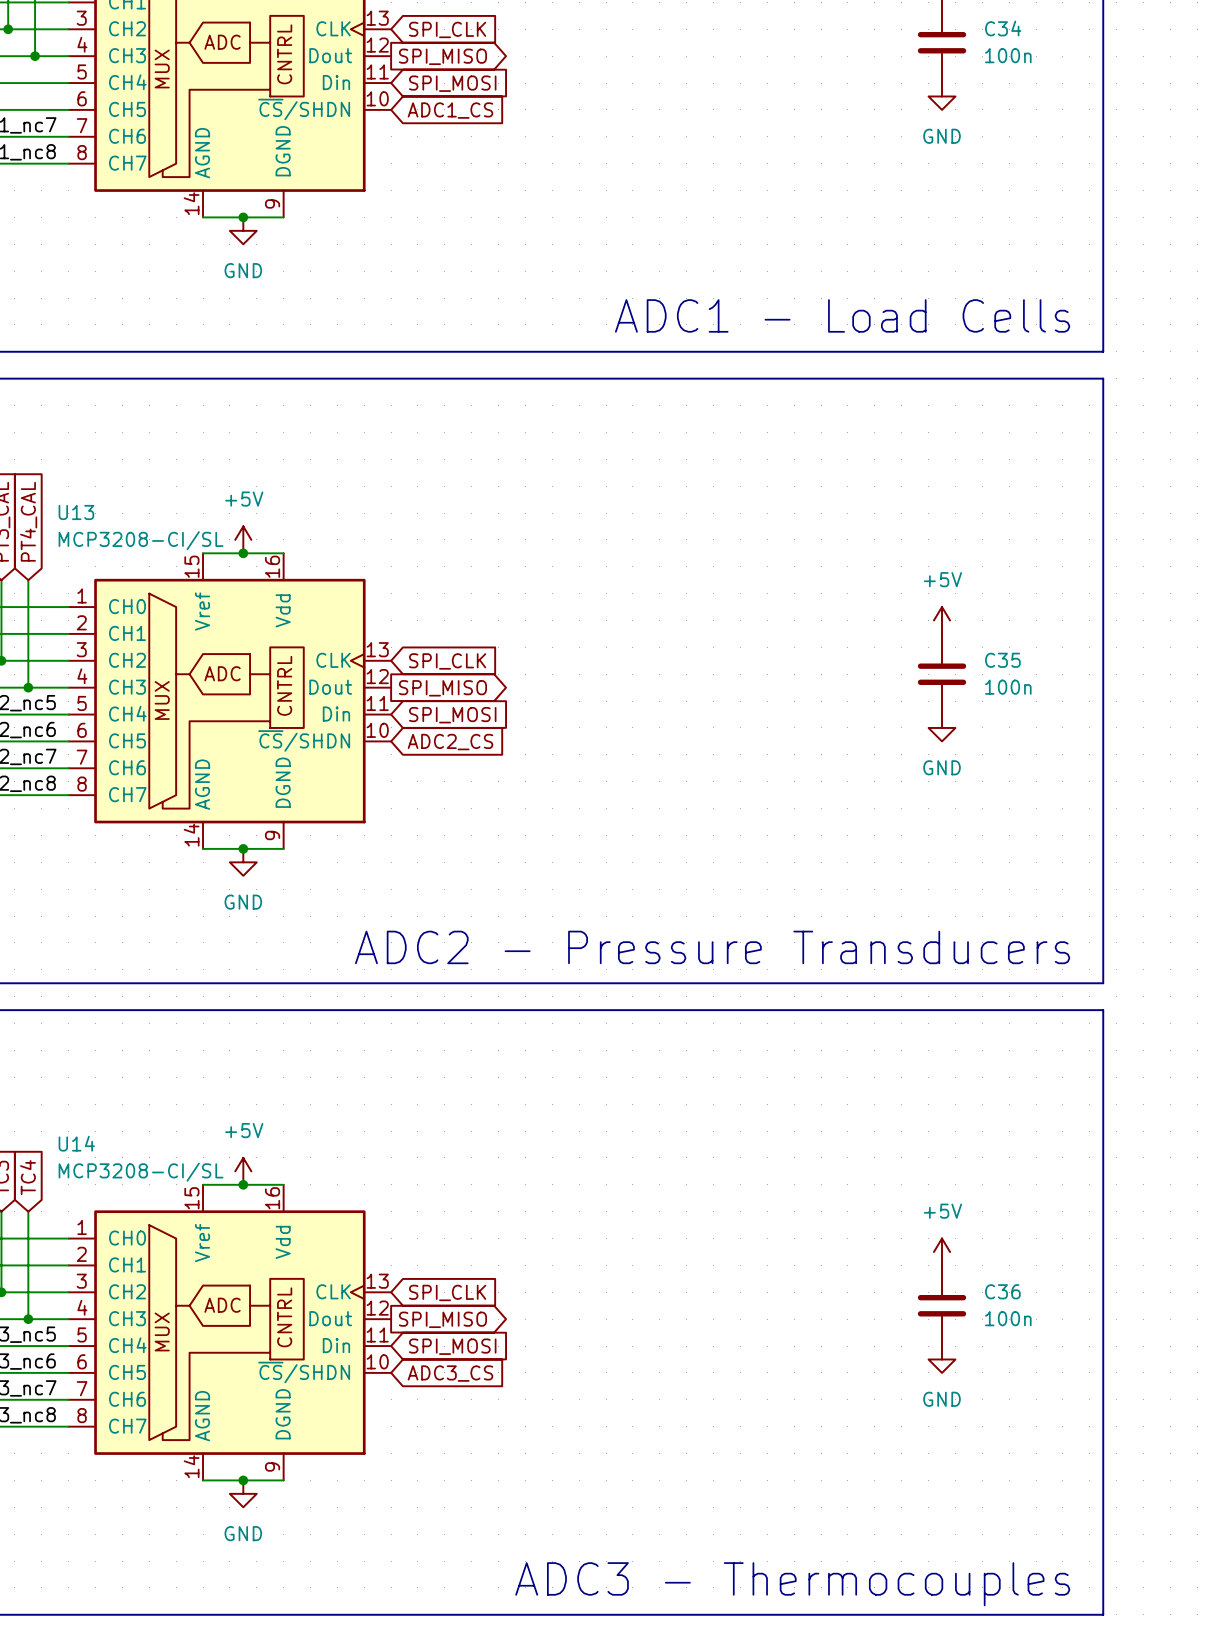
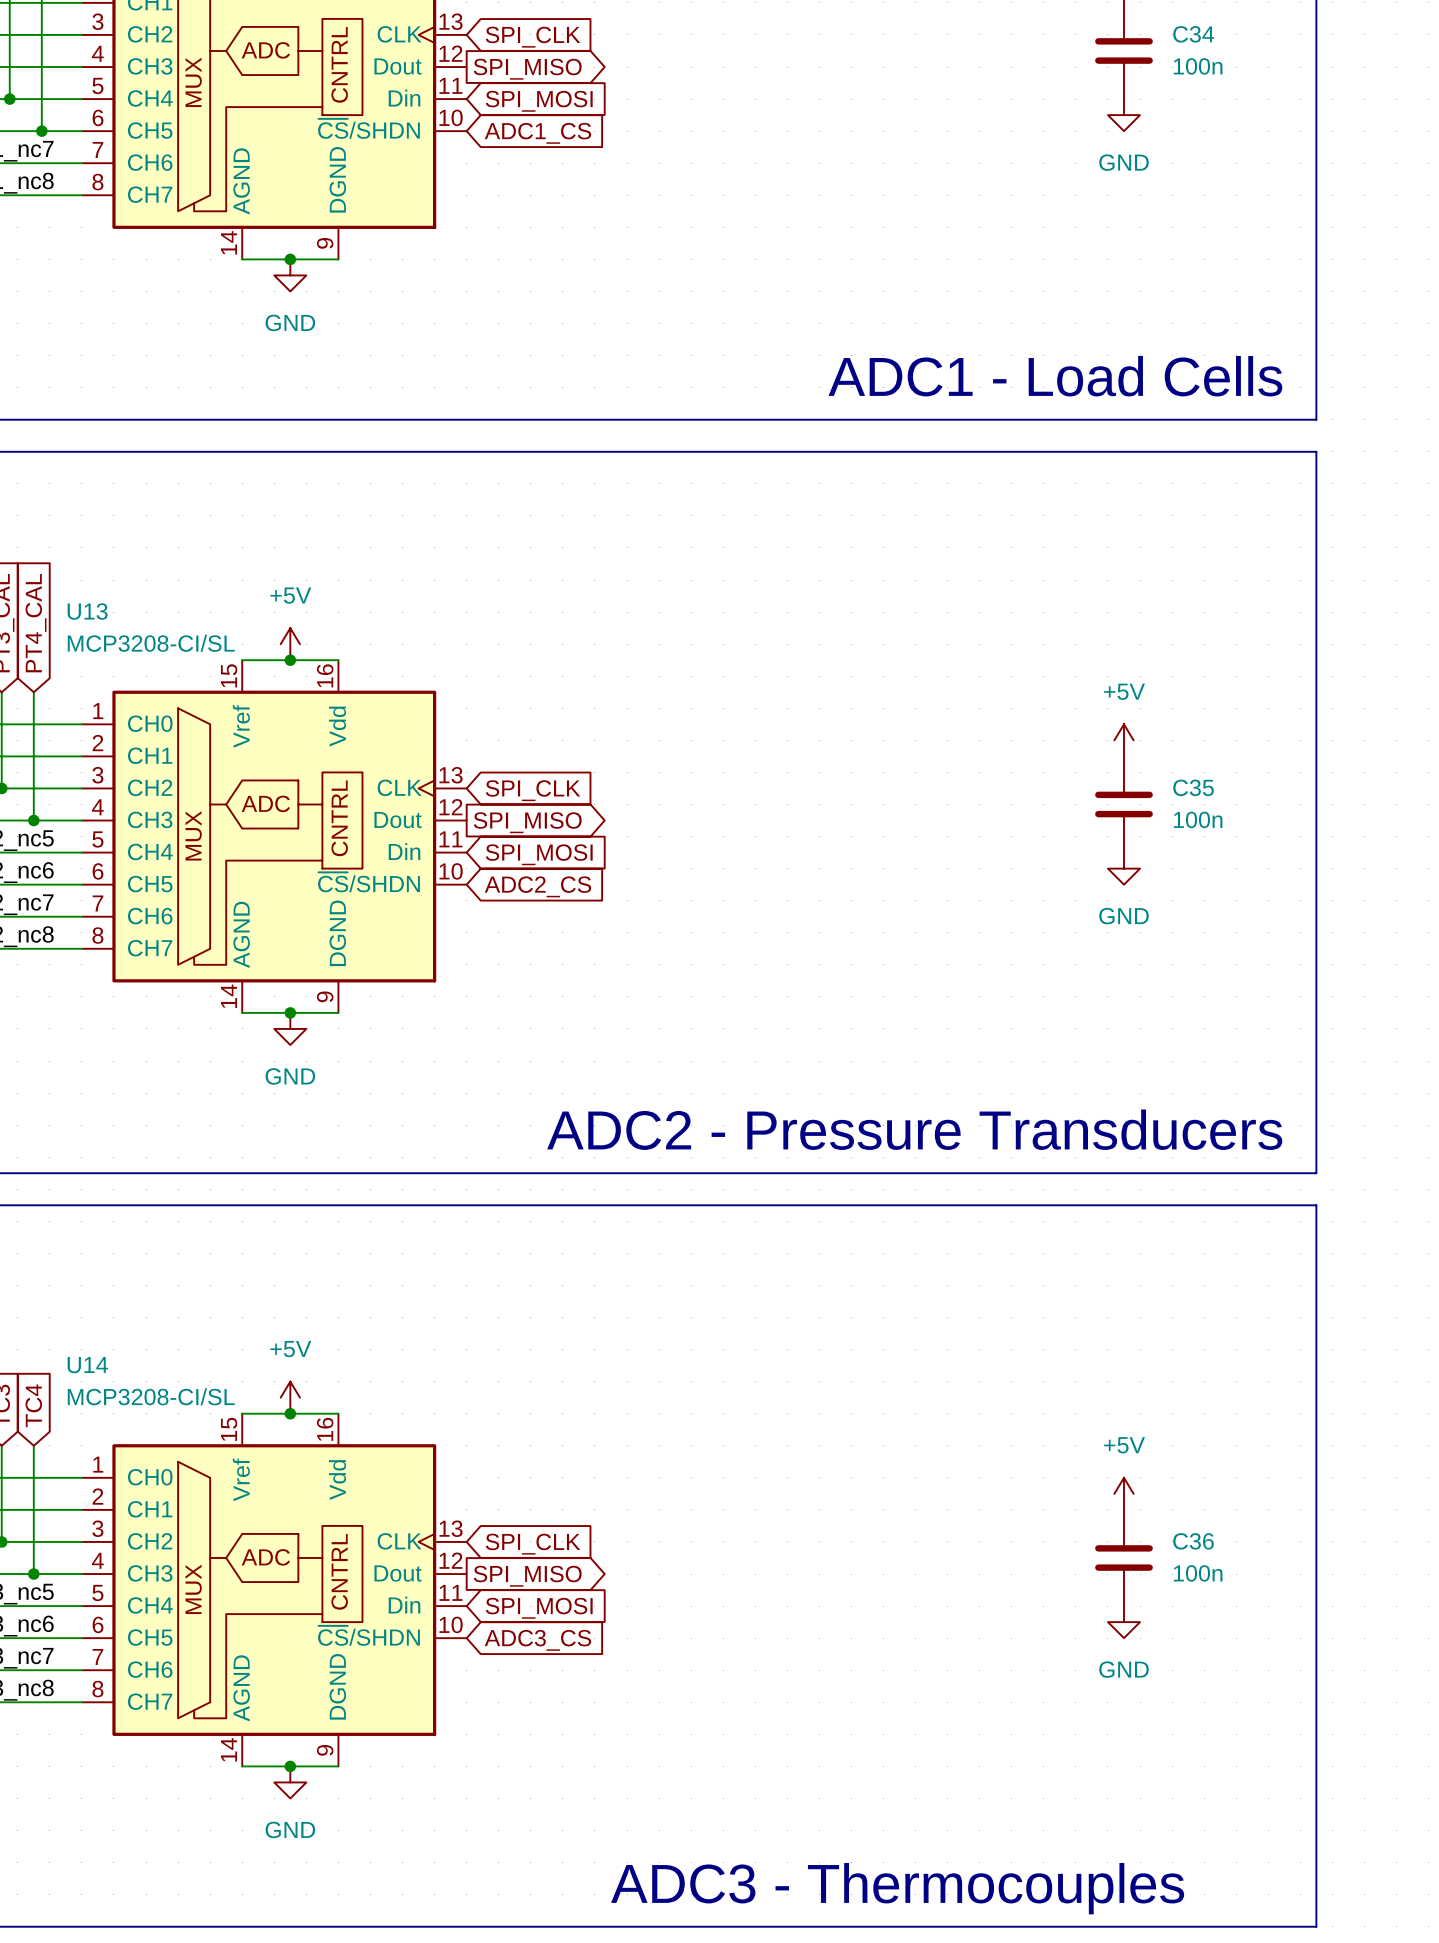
wire: none -> (9, 34) (9, 99)
junction: (8, 29) -> none
wire: none -> (41, 67) (41, 131)
junction: (35, 56) -> none
junction: none -> (9, 99)
junction: none -> (41, 131)

